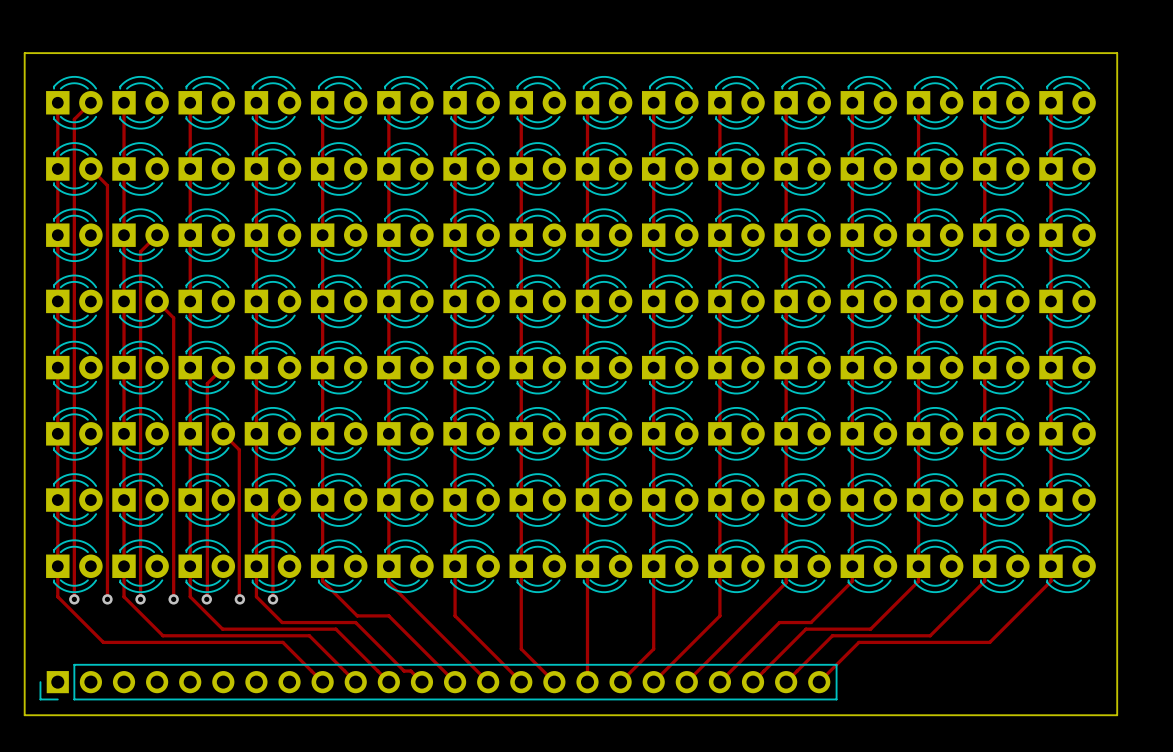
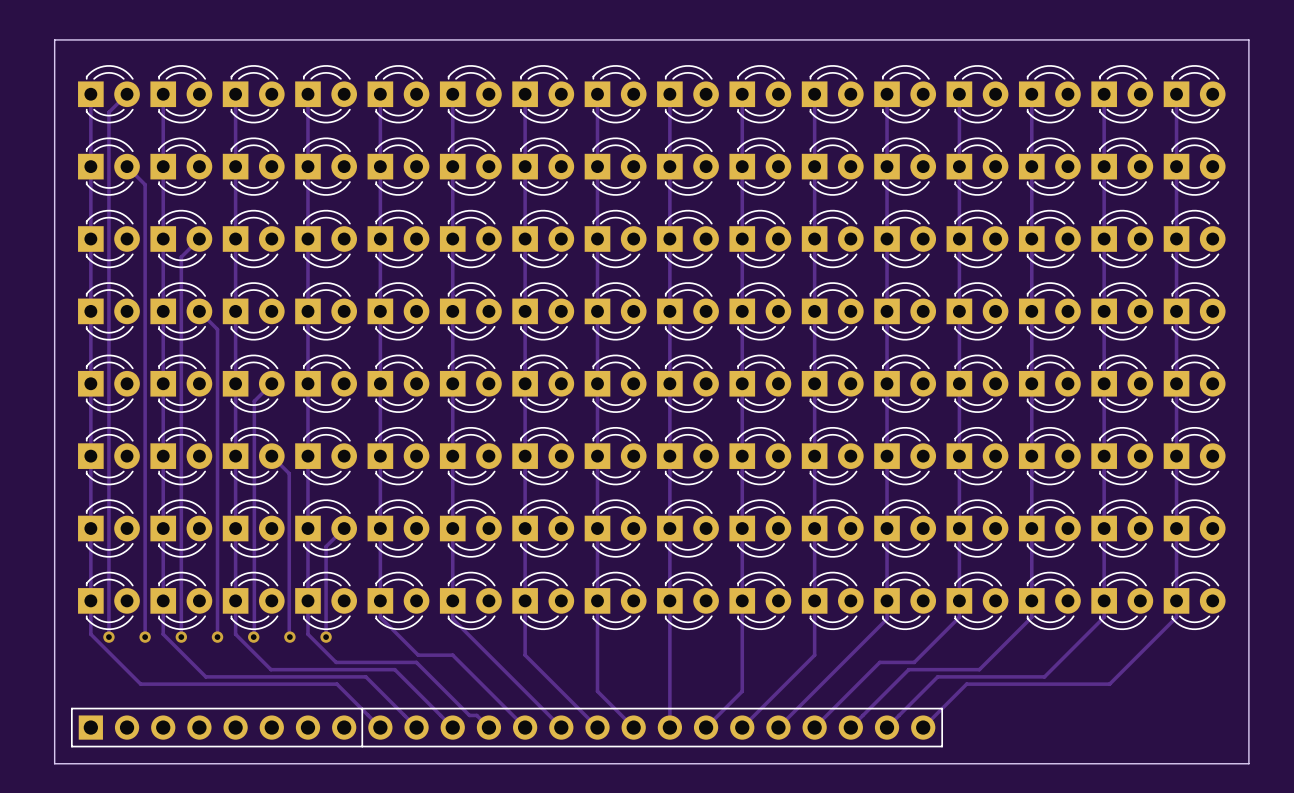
part footprint: [39, 664, 838, 701] -> [71, 707, 944, 748]

